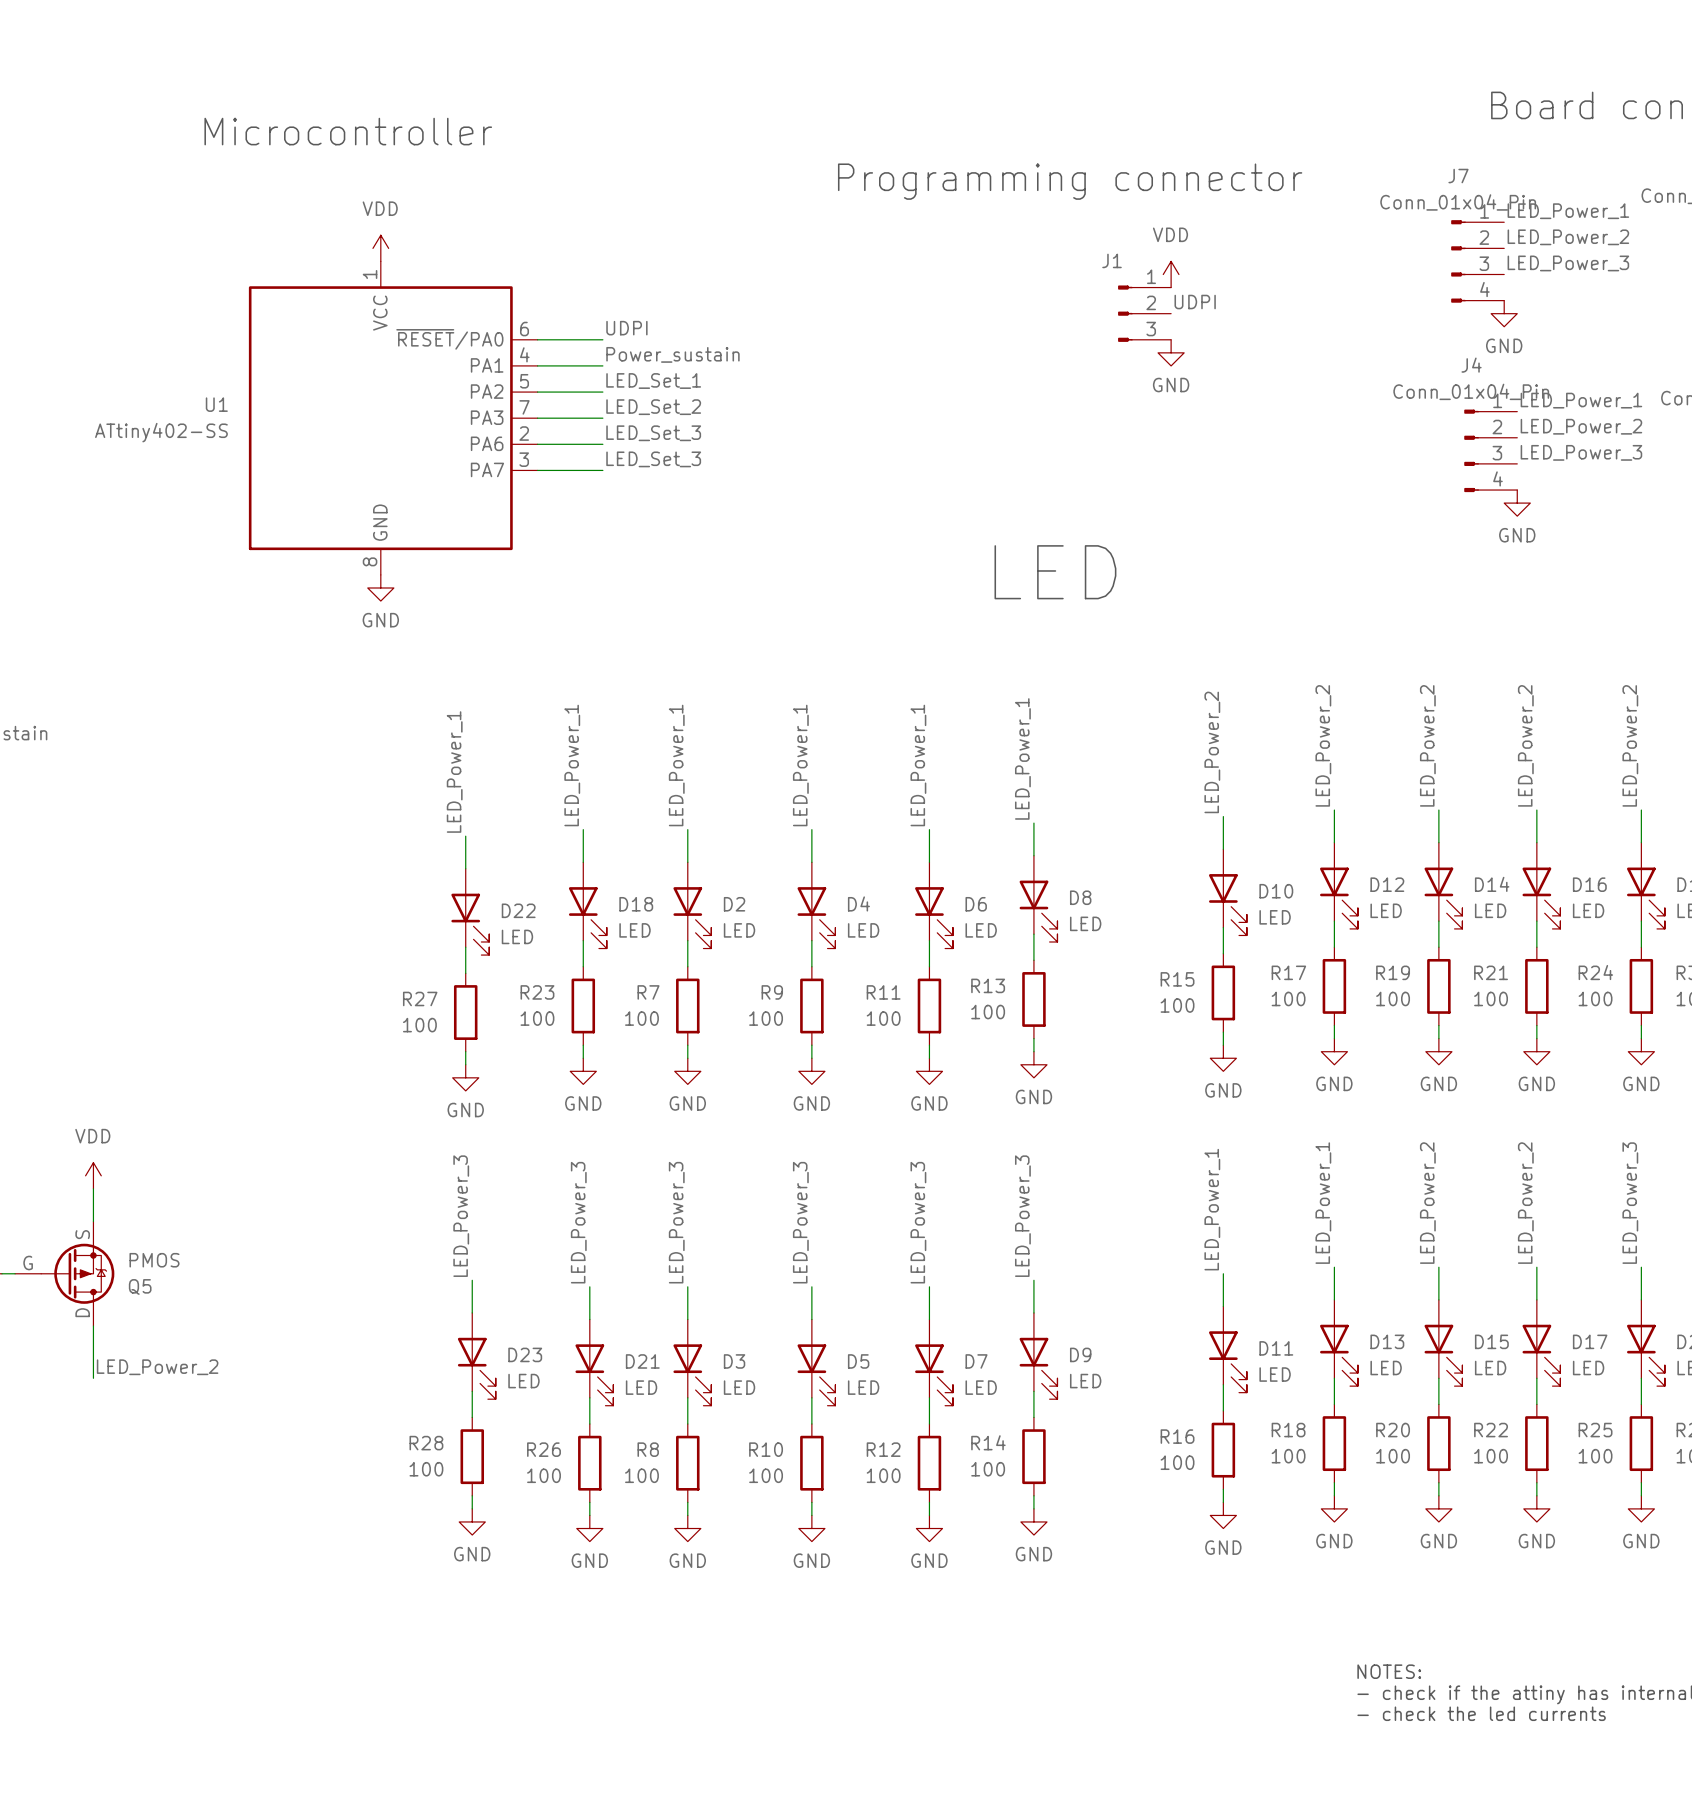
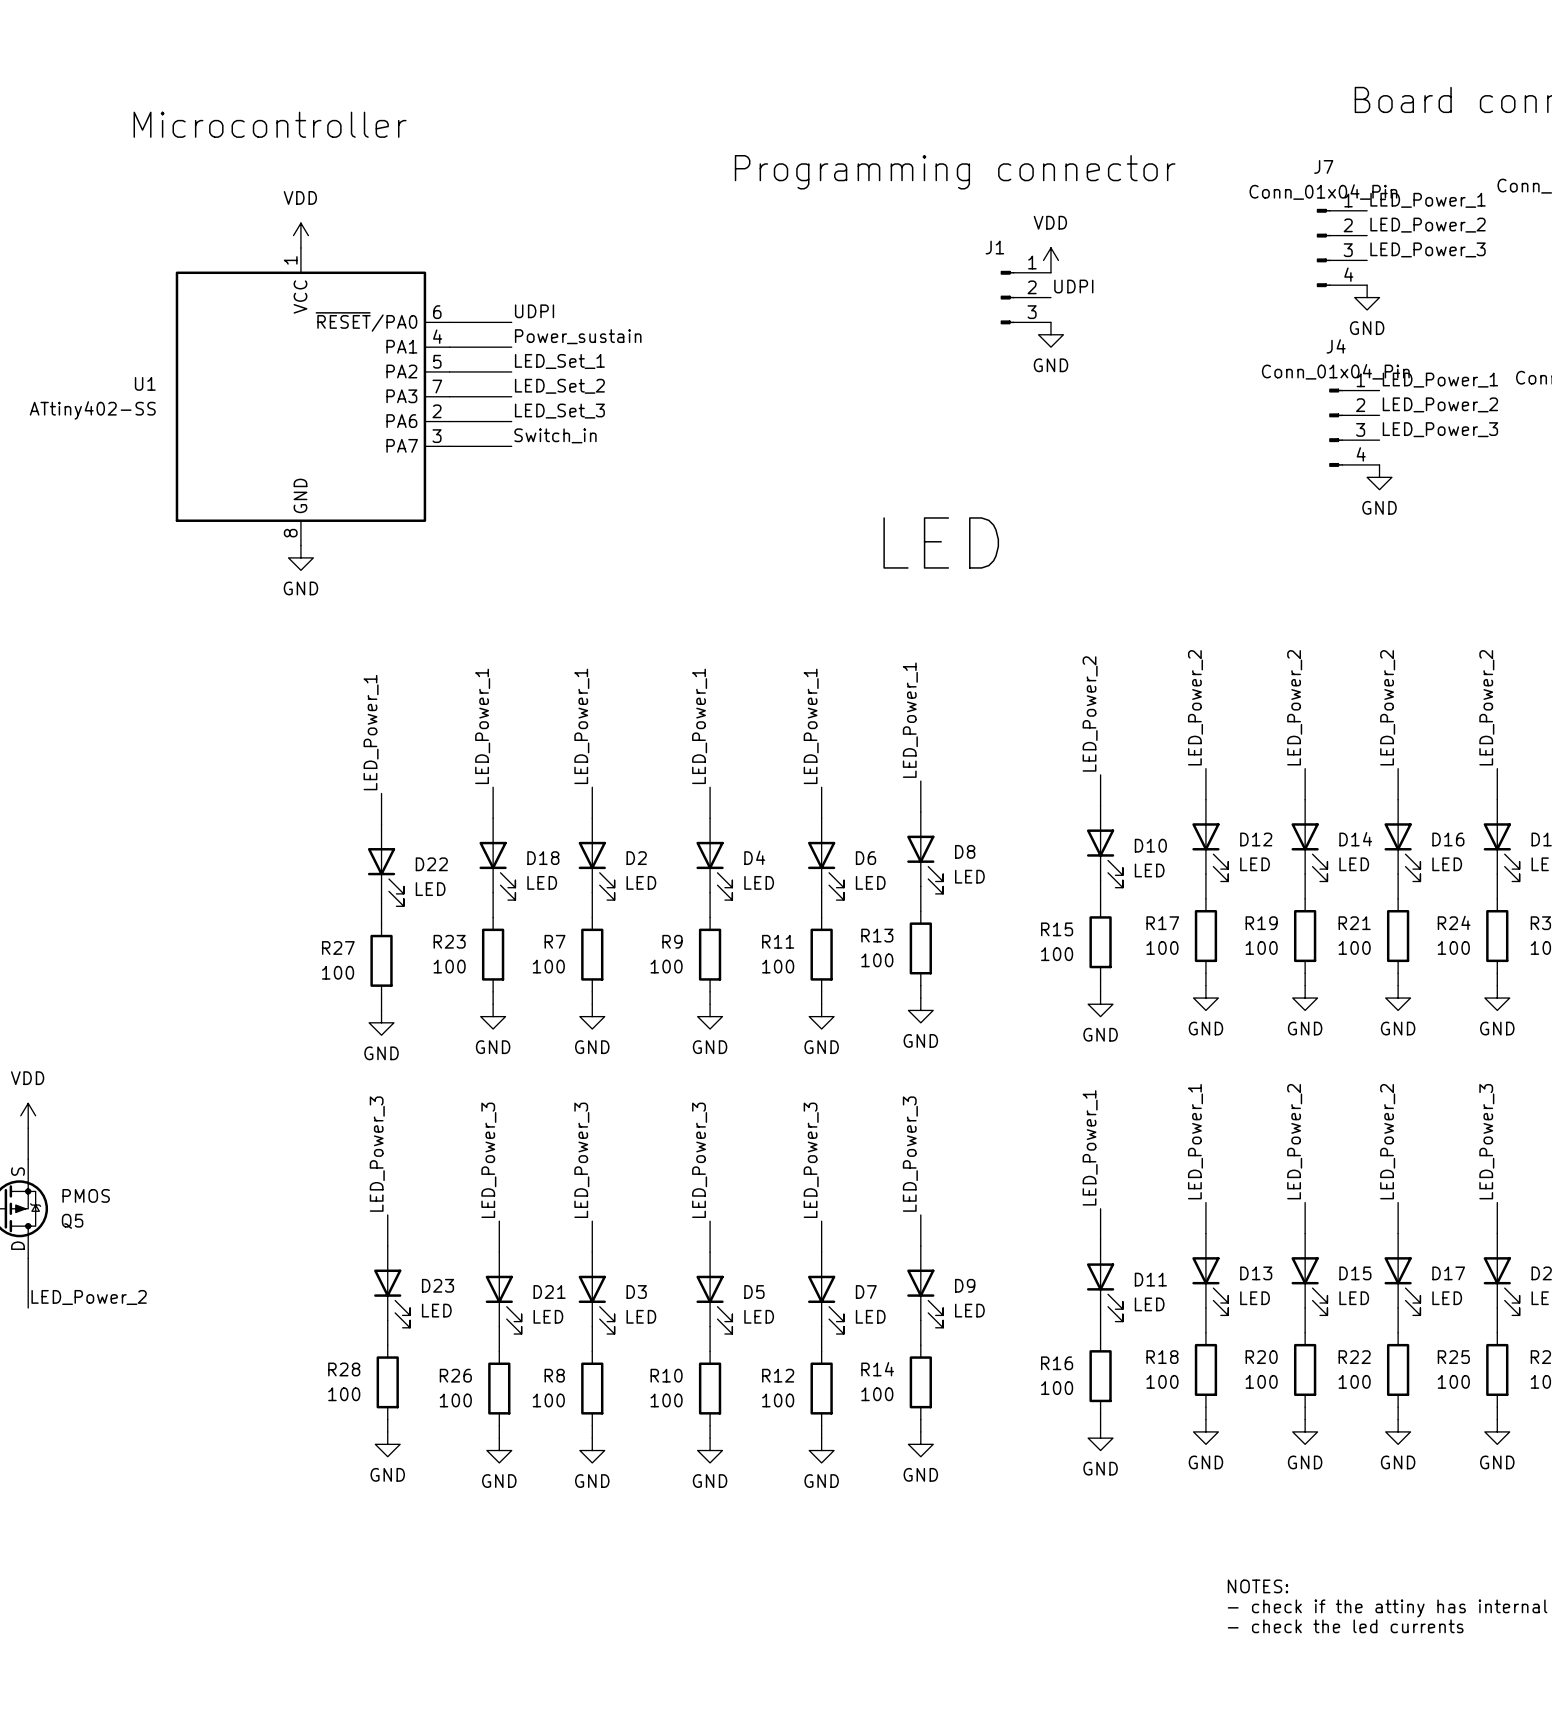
label: LED_Set_3 (653, 459) -> Switch_in (555, 435)

